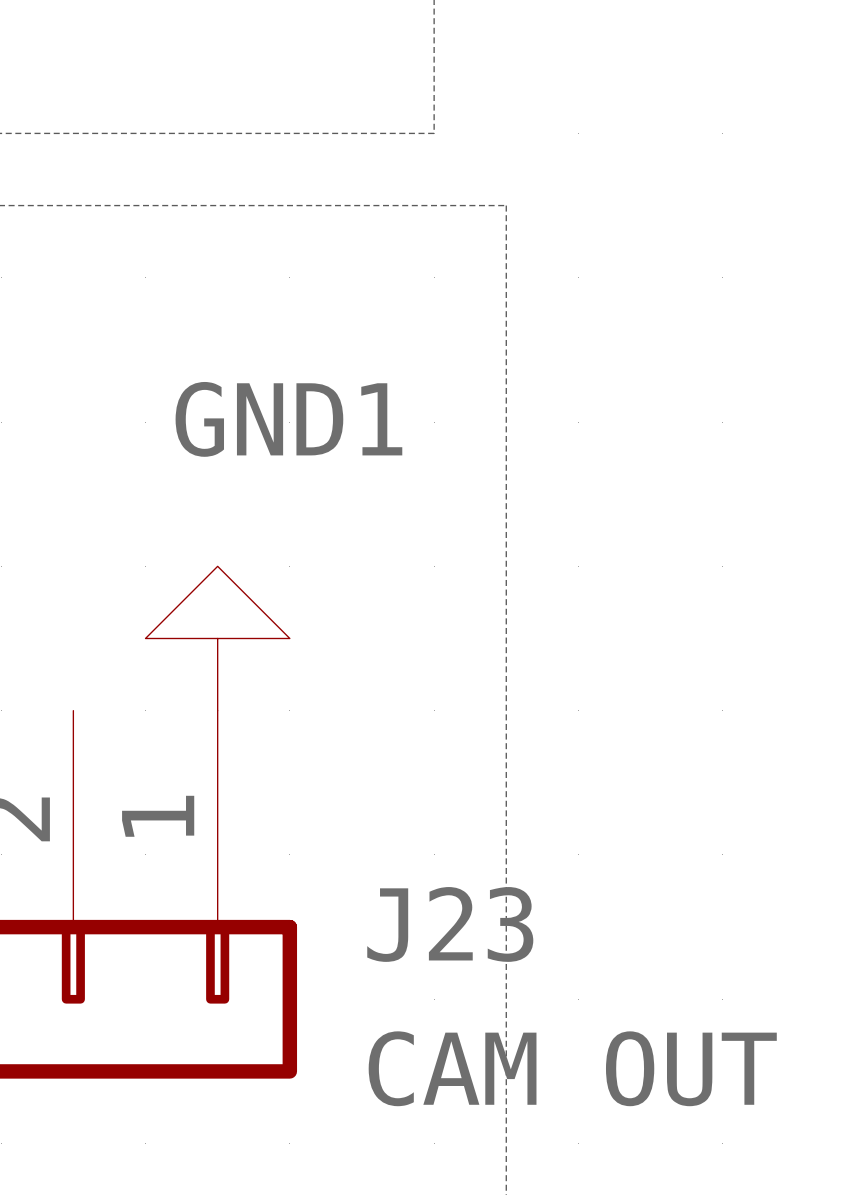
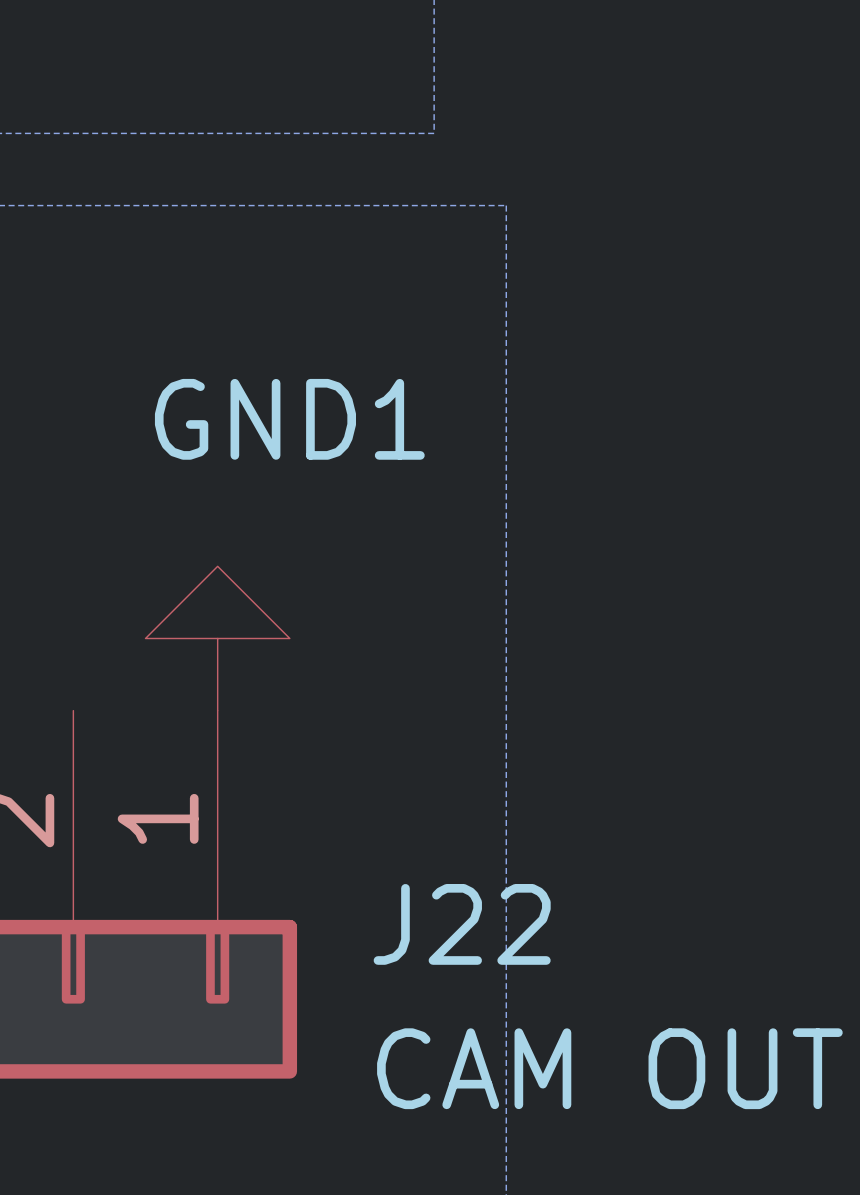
J23 name: J23 (450, 924) -> J22 (462, 924)

